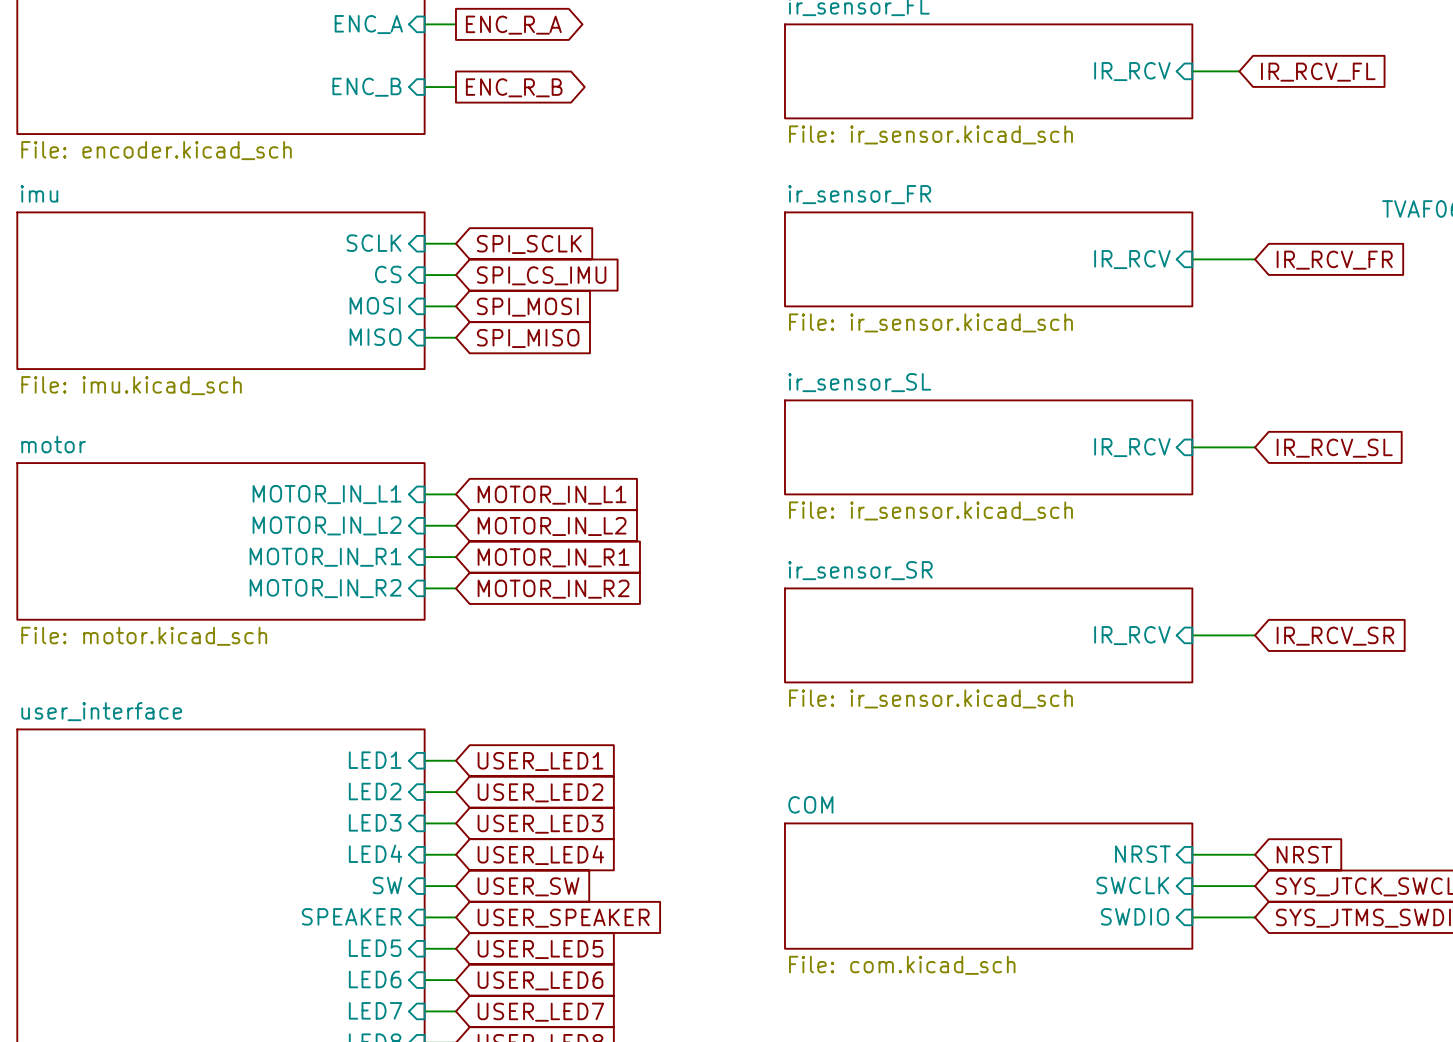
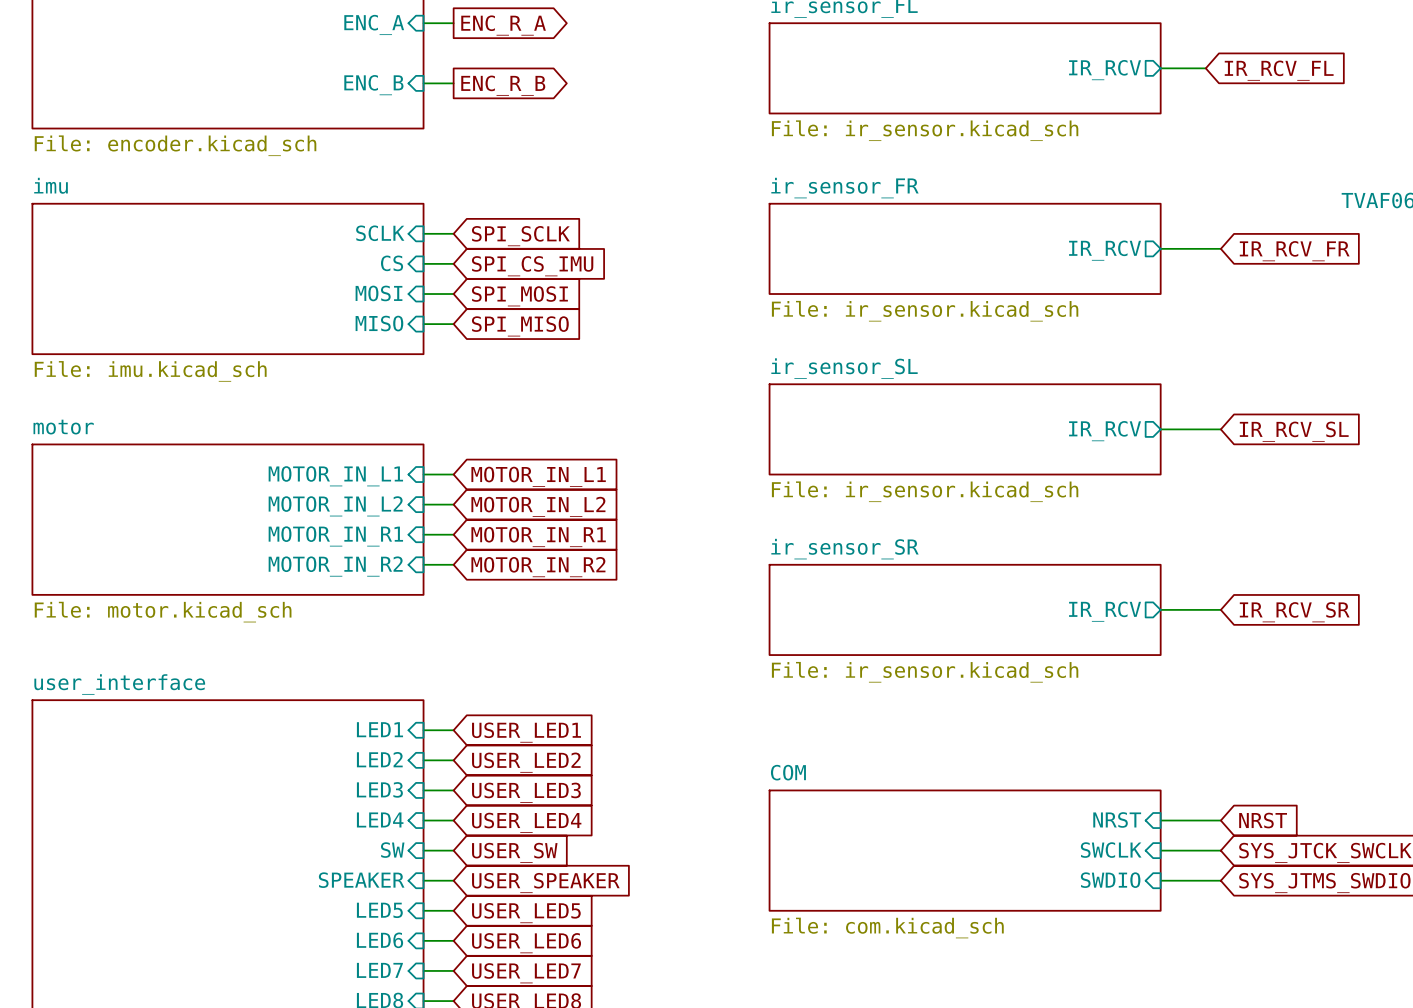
sheet pin shape: input (1132, 71) -> output (1105, 70)
sheet pin shape: input (1132, 259) -> output (1105, 250)
sheet pin shape: input (1132, 447) -> output (1105, 431)
sheet pin shape: input (1132, 635) -> output (1105, 611)

